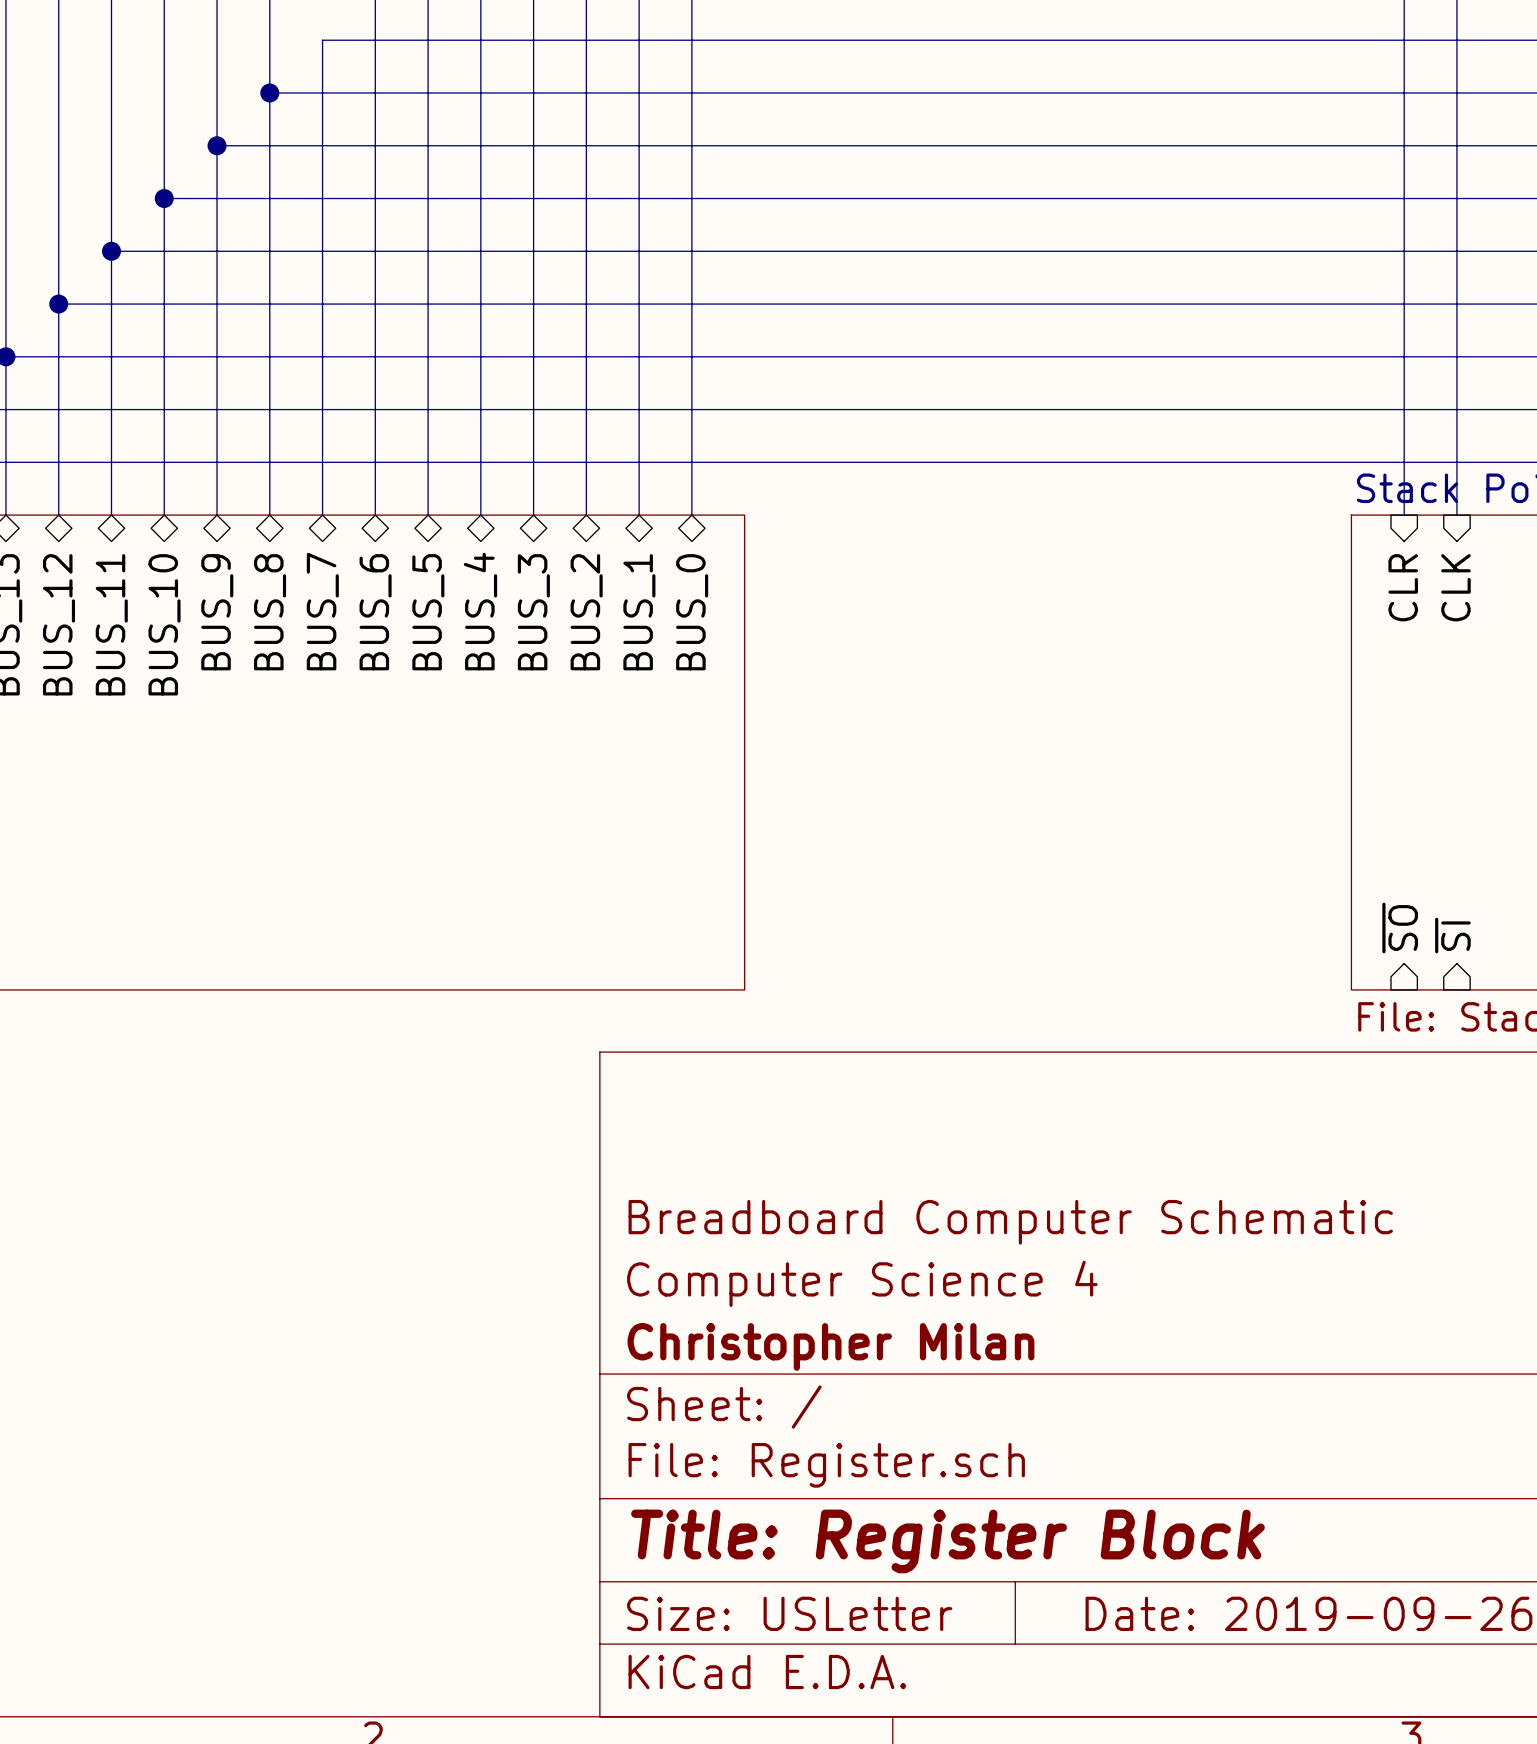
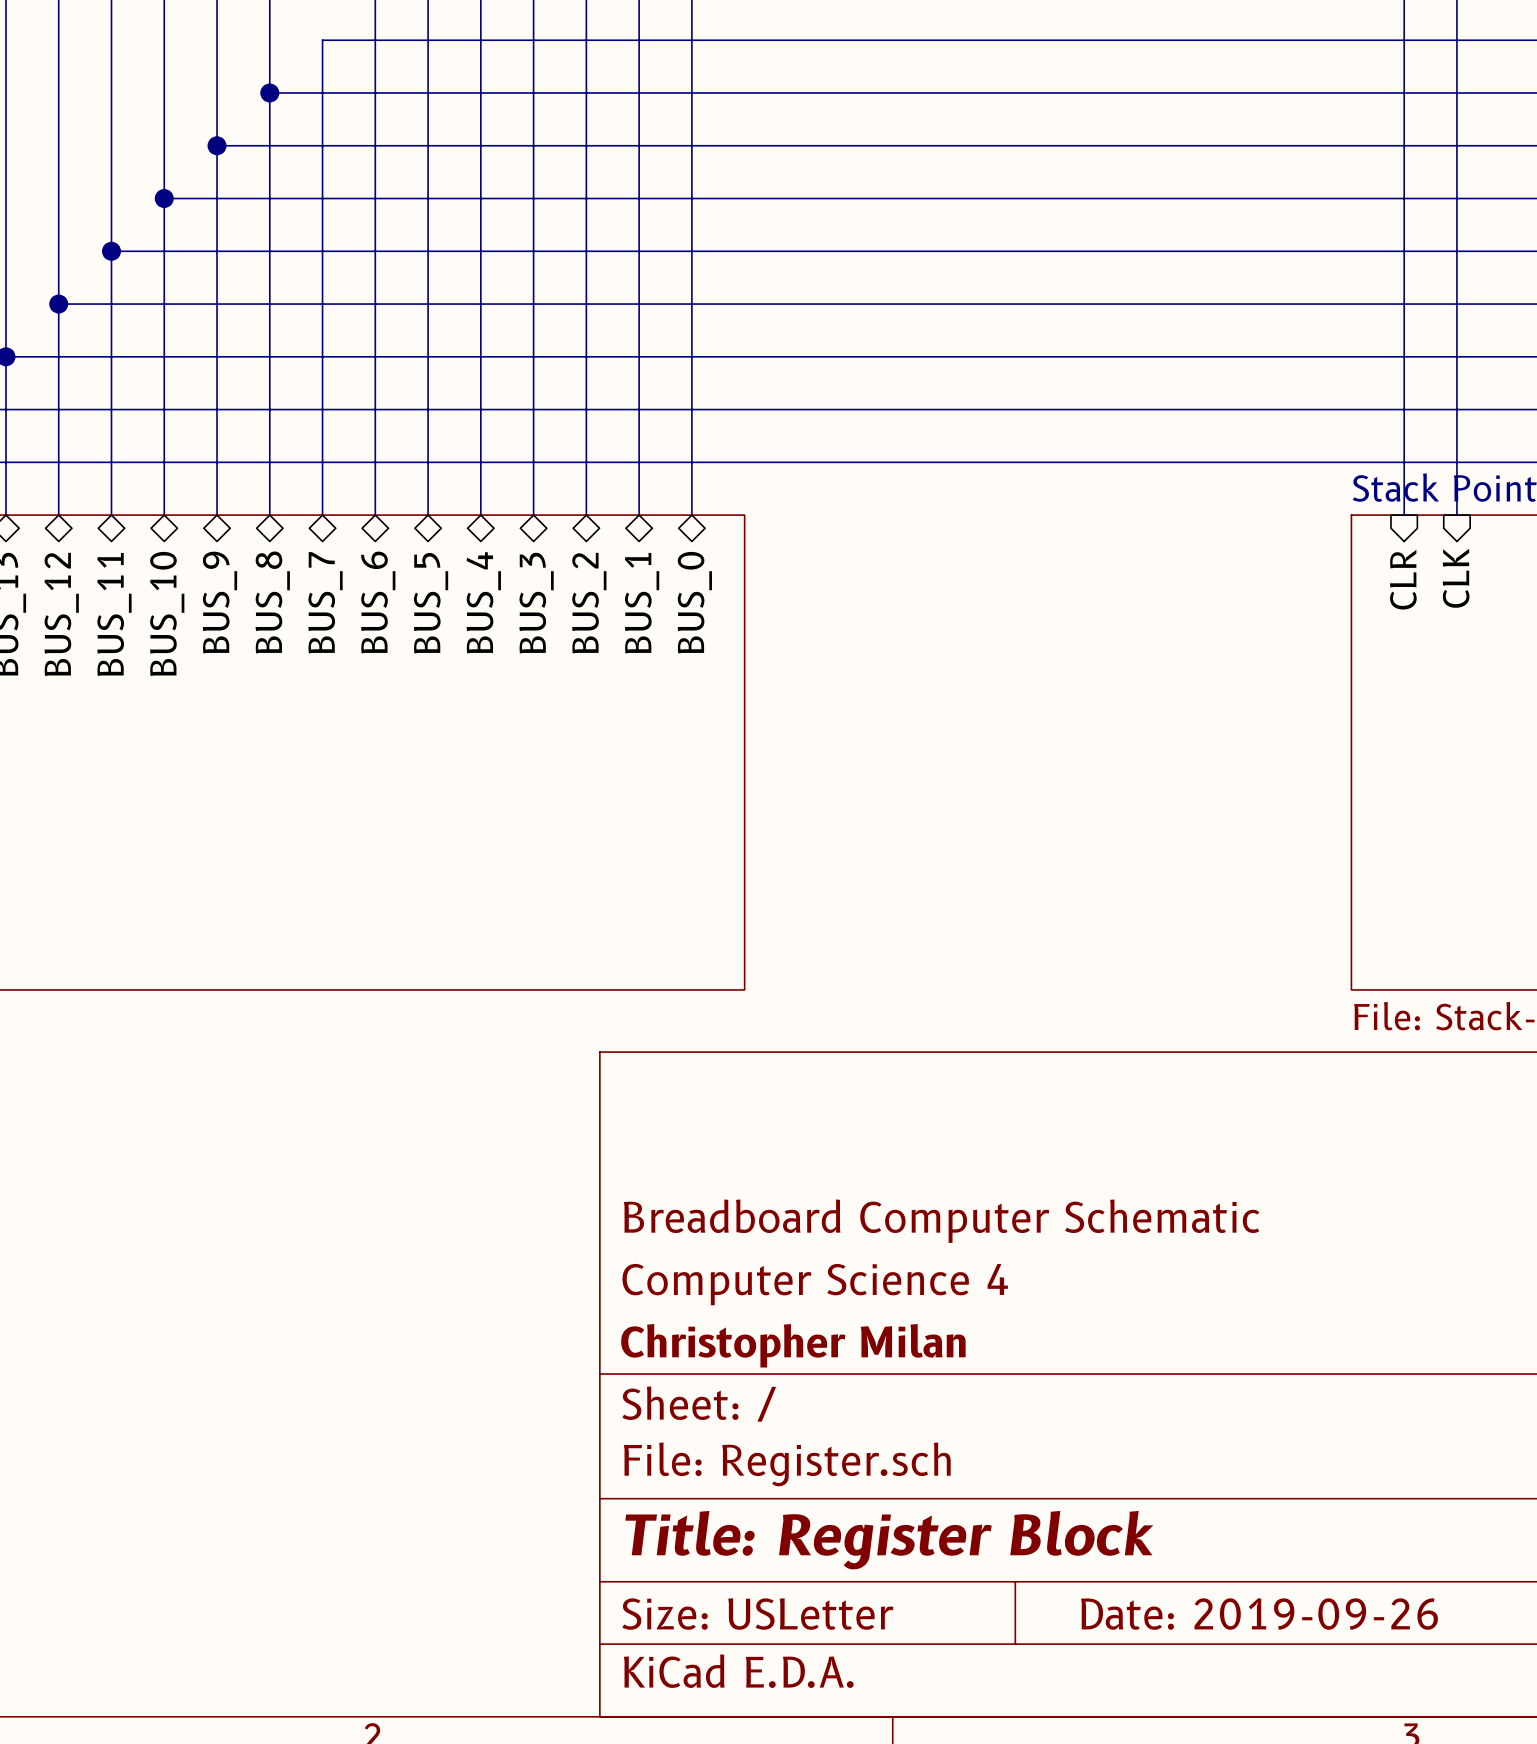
sheet pin: ~{SO} (1400, 927) -> none
sheet pin: ~{SI} (1452, 935) -> none

